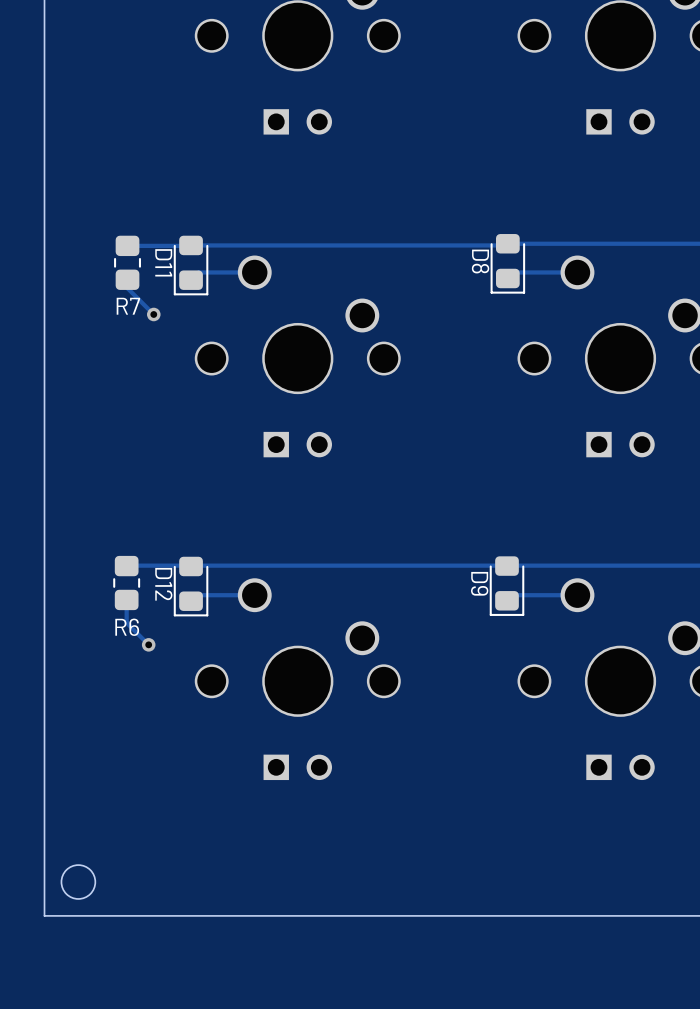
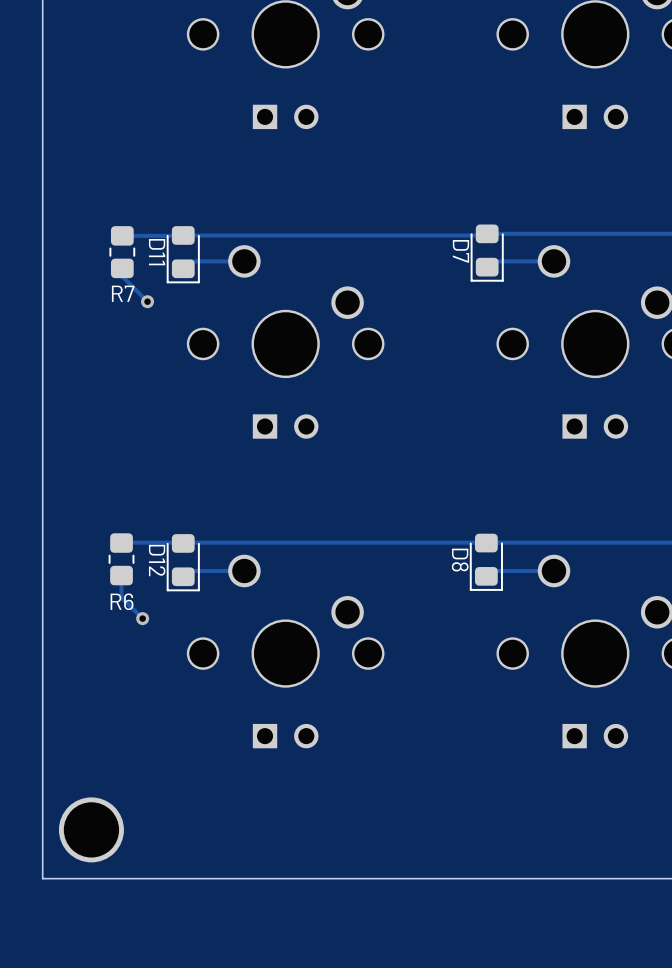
D8 name: D8 (480, 261) -> D7 (460, 251)
D9 name: D9 (479, 583) -> D8 (460, 560)
round board edge: [60, 864, 97, 900] -> none
part: none -> (91, 829)

